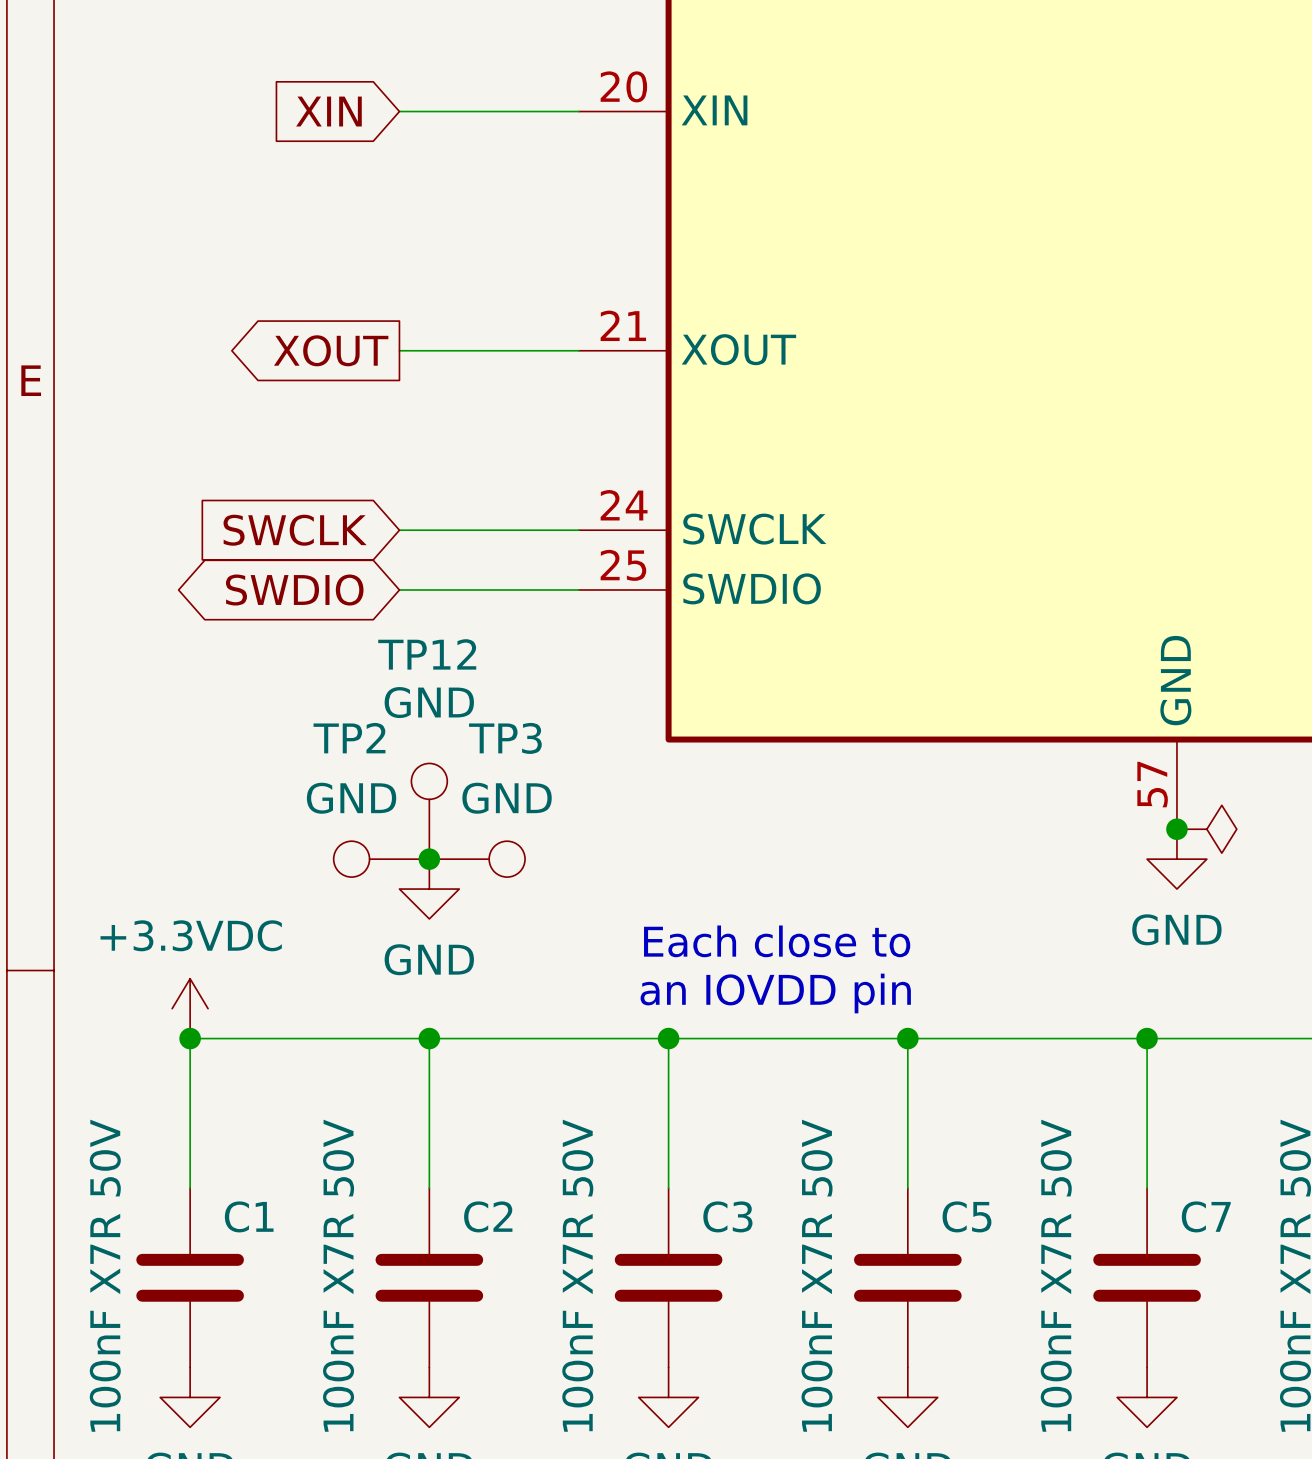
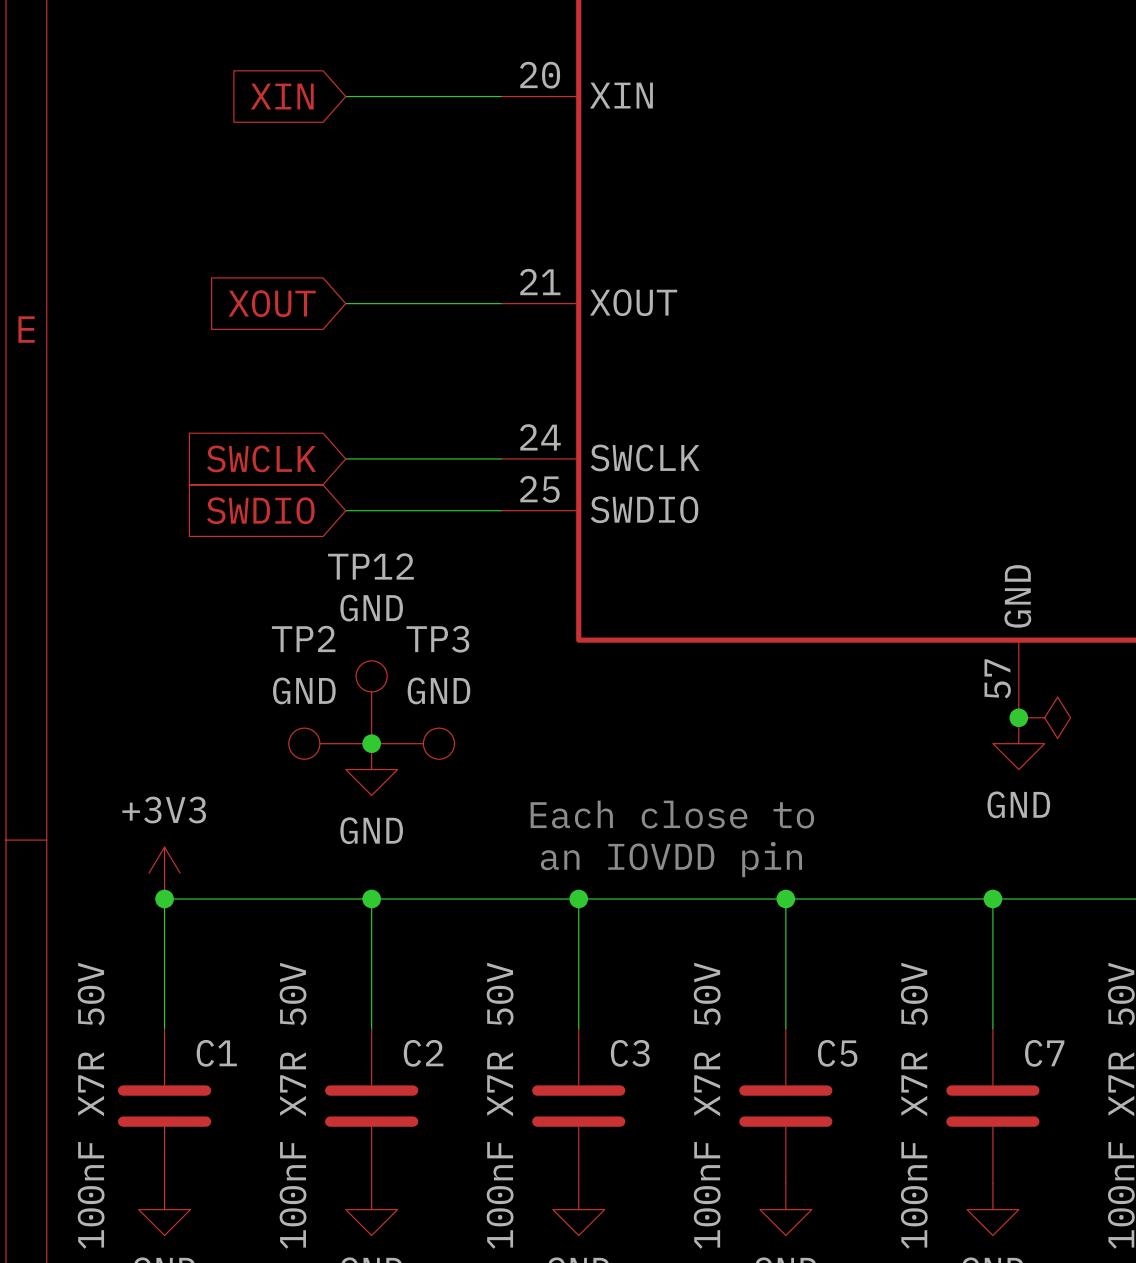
global label shape: output (331, 350) -> input (272, 303)
global label shape: bidirectional (294, 590) -> input (260, 510)
power symbol: +3.3VDC (190, 1008) -> +3V3 (164, 873)

